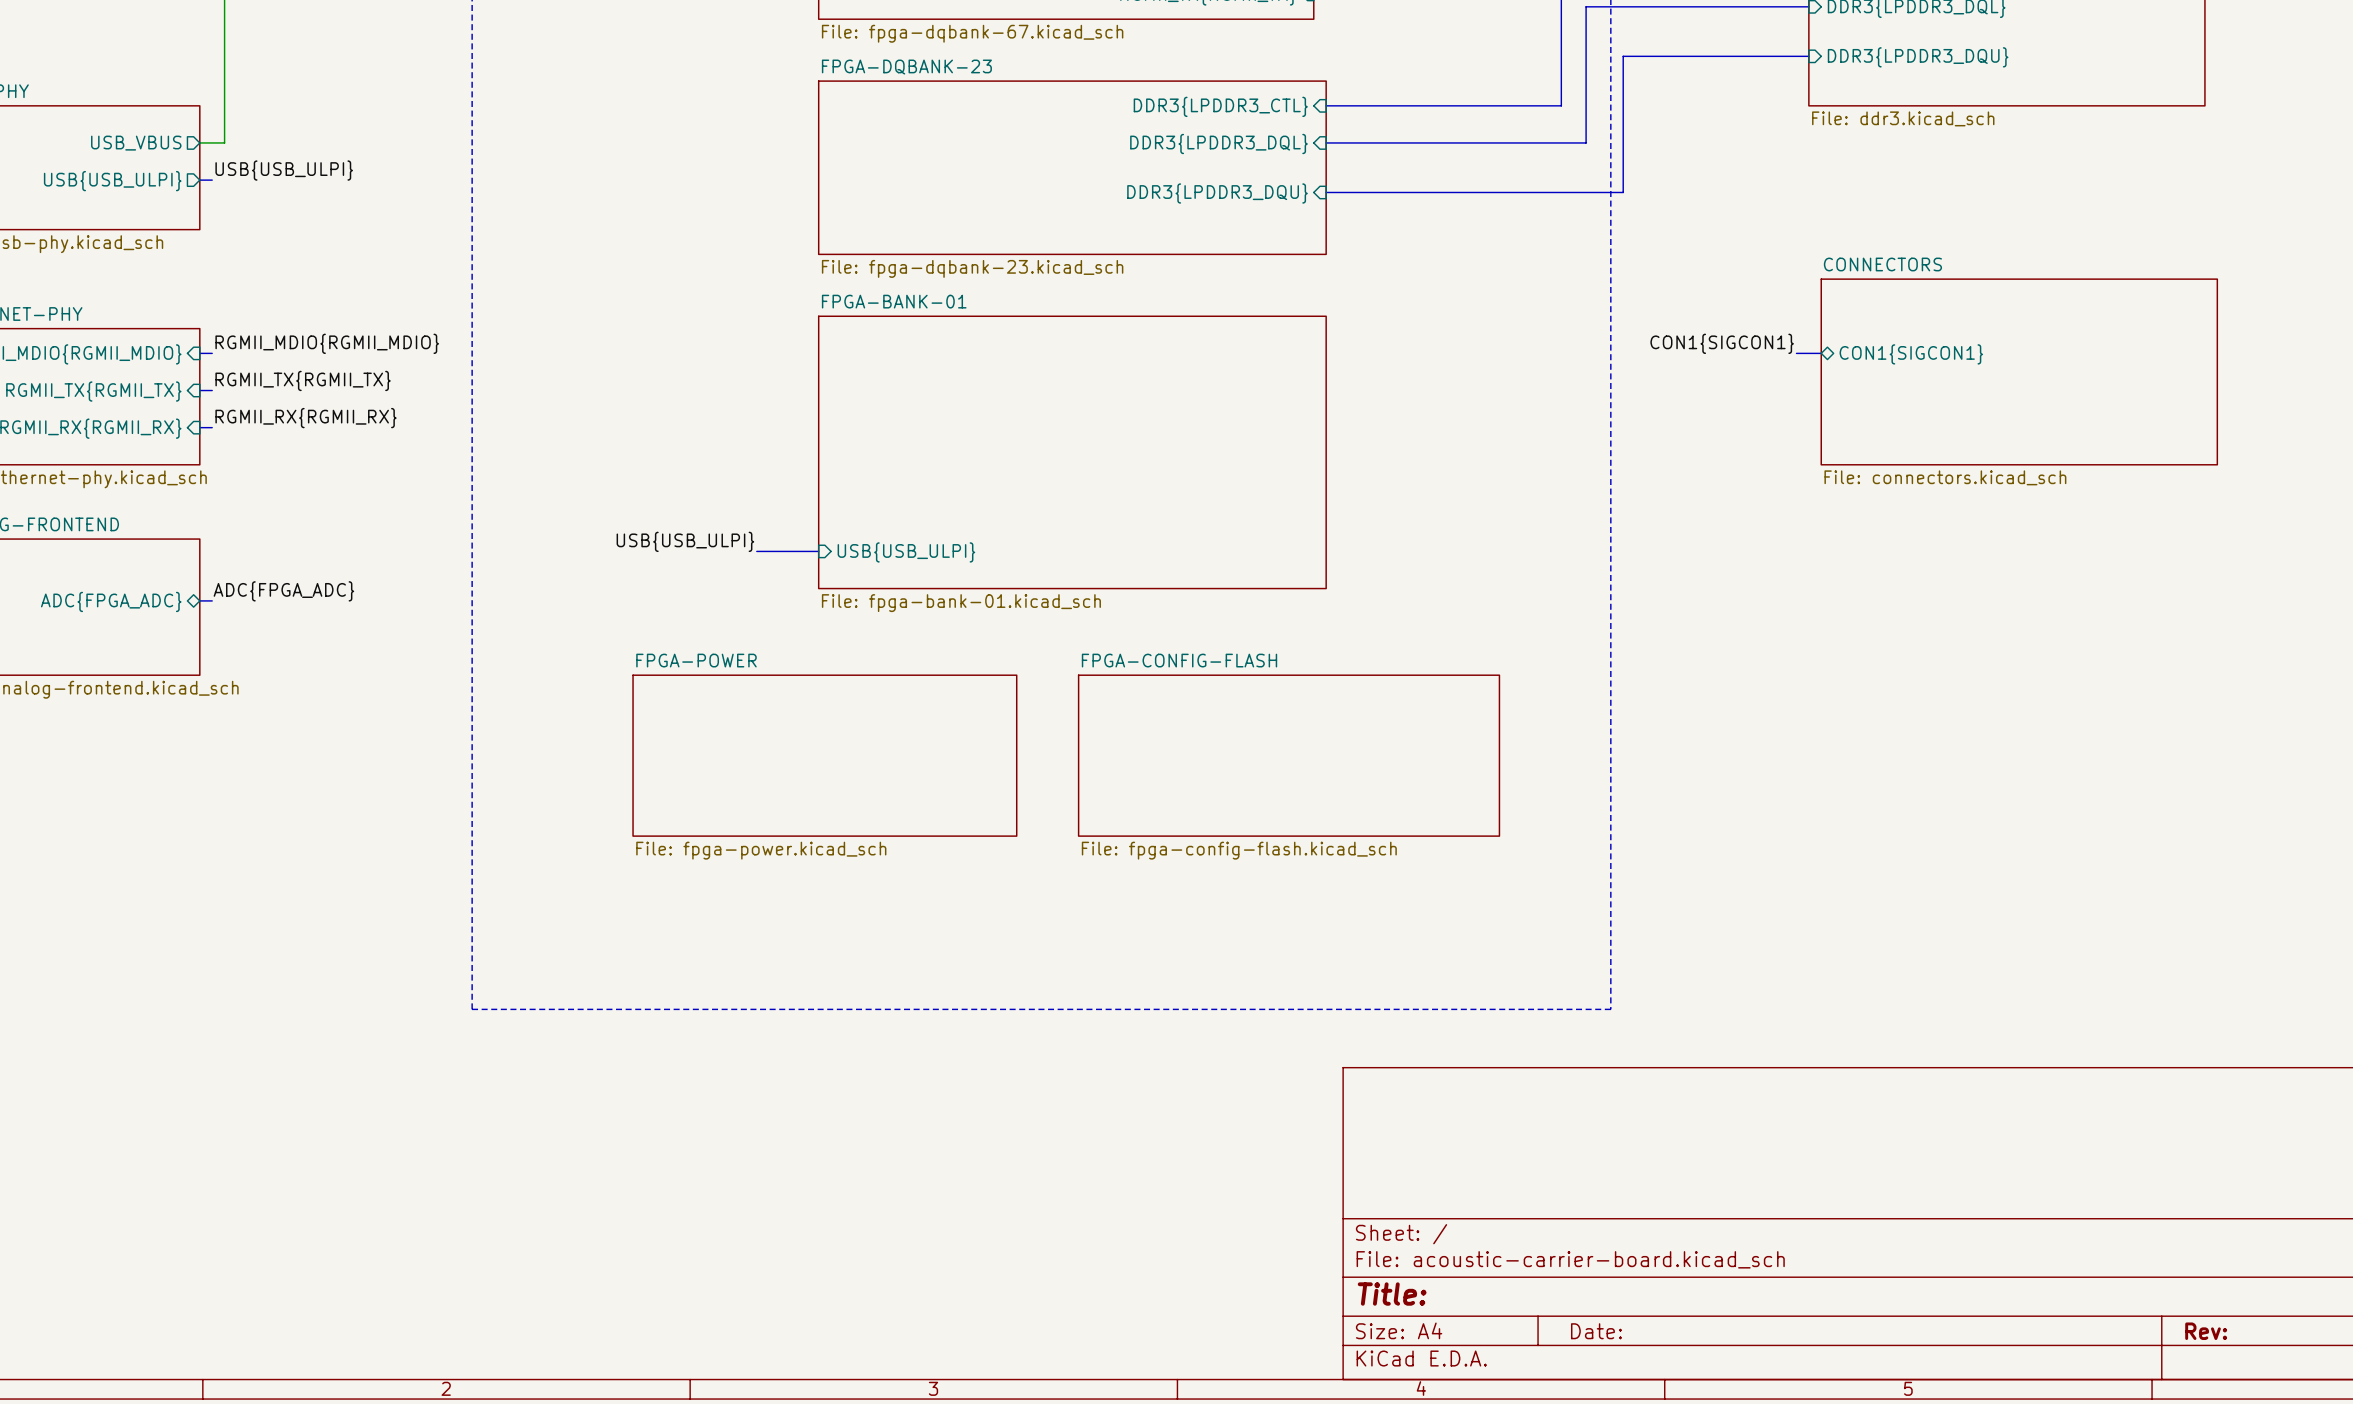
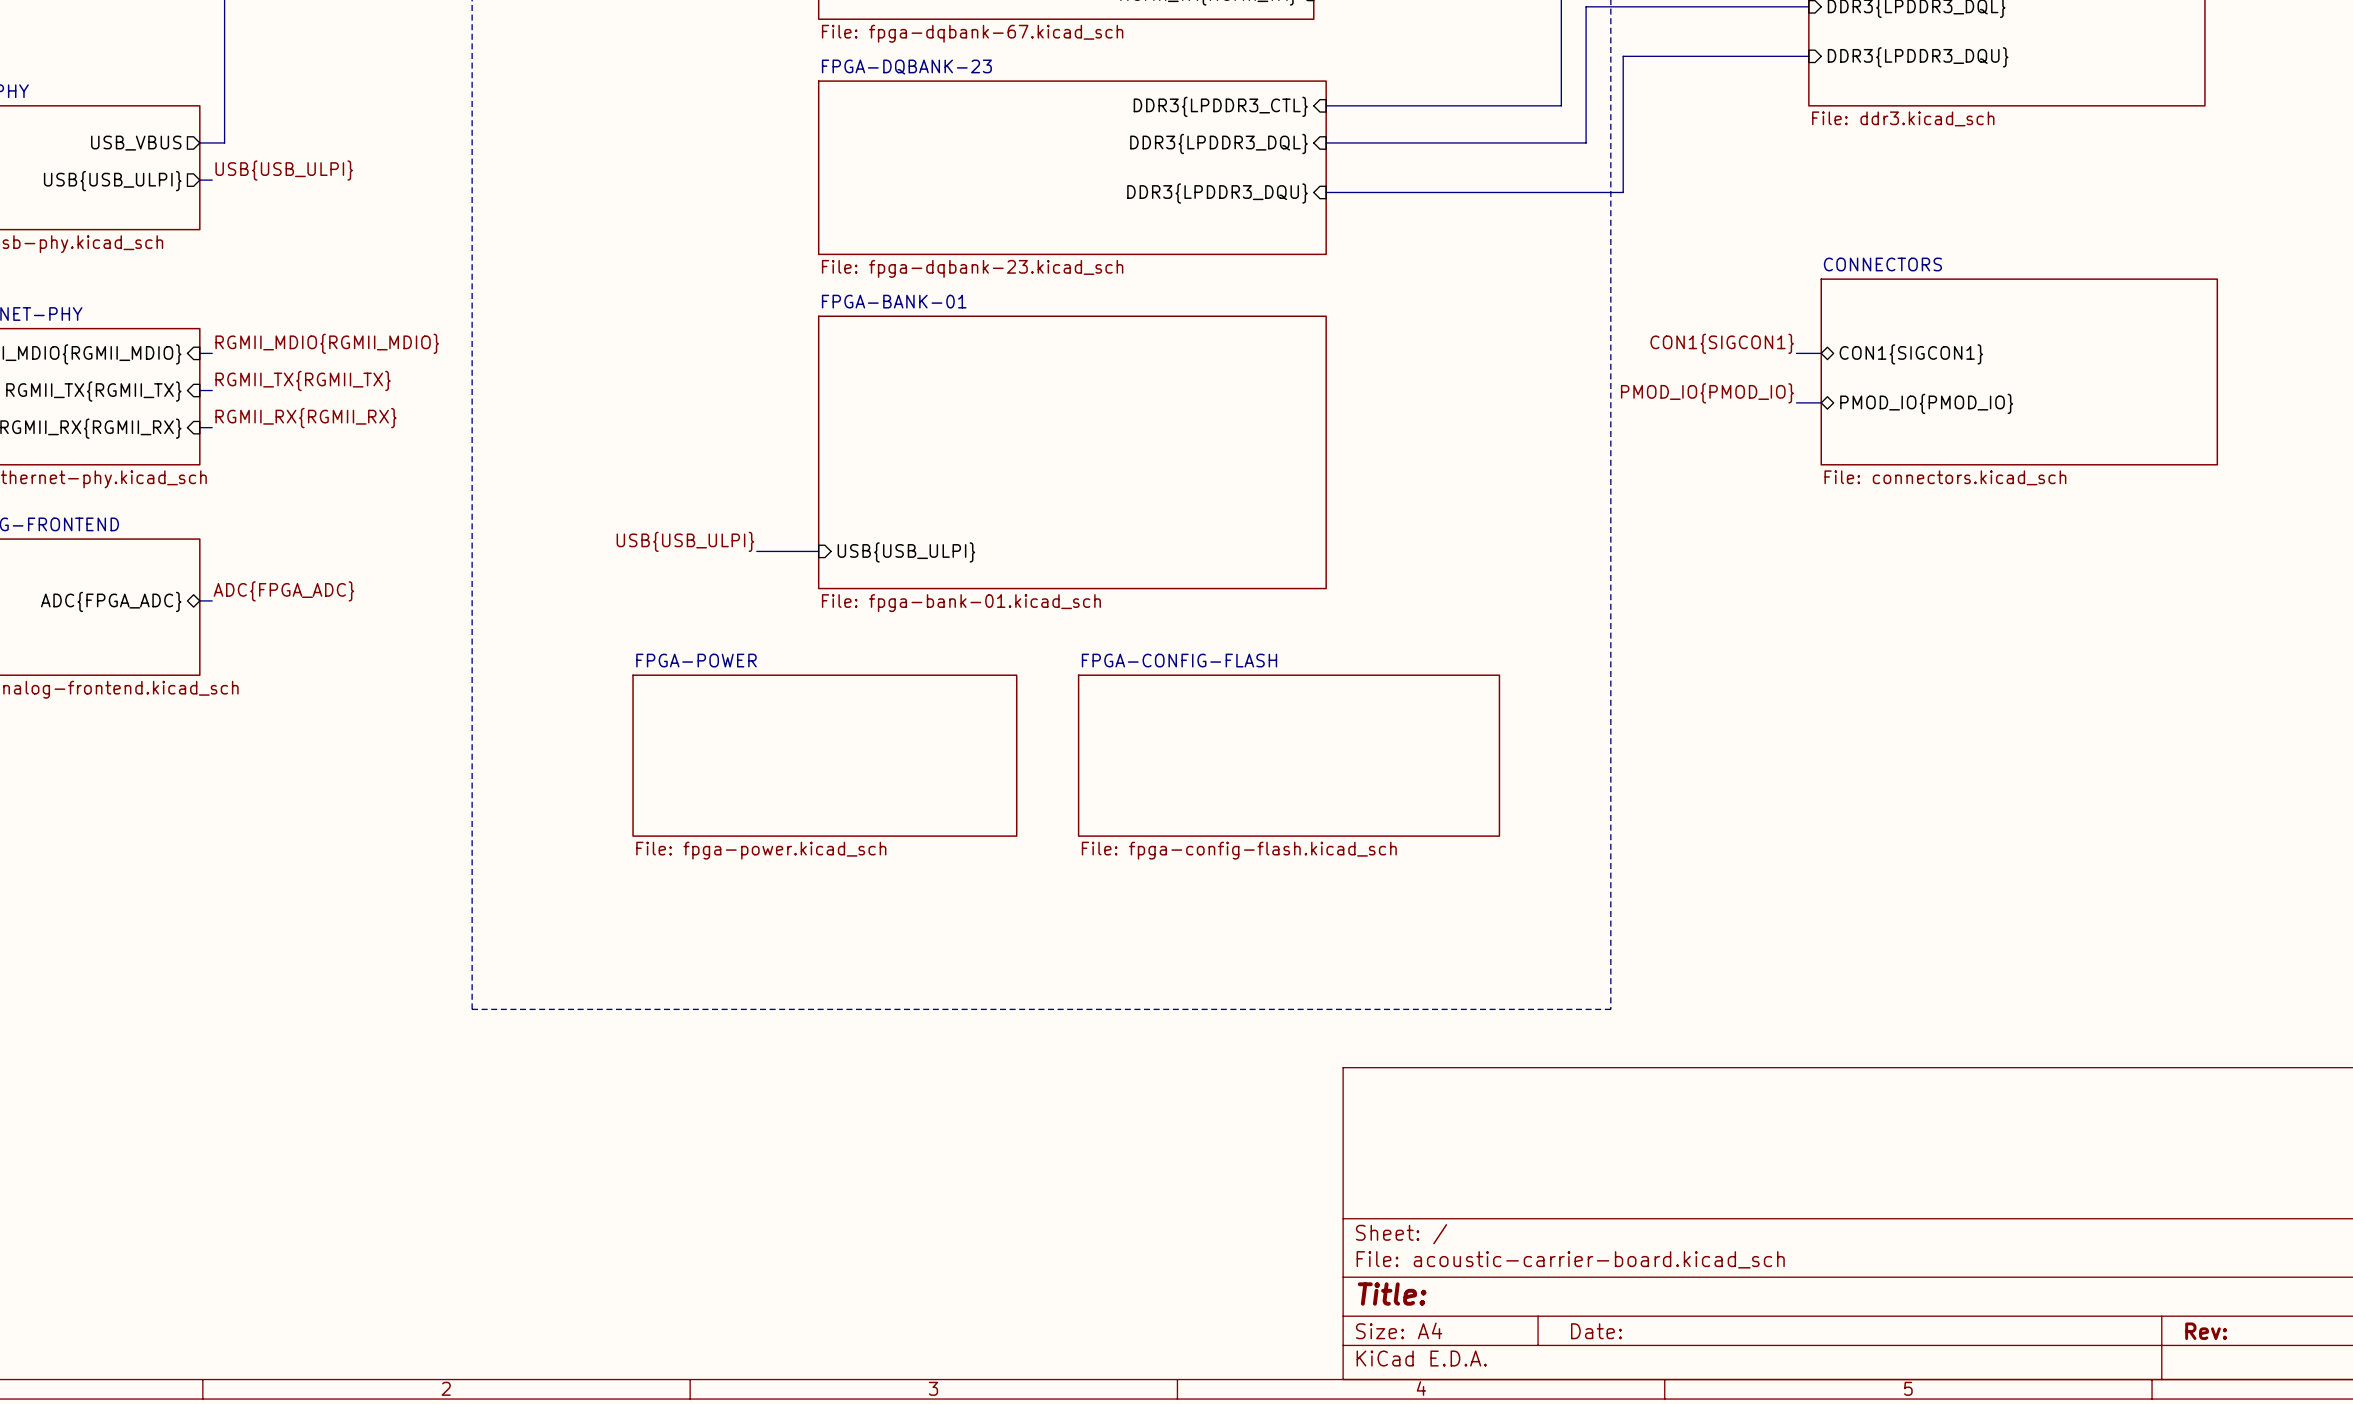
label: none -> PMOD_IO{PMOD_IO} (1707, 393)
bus: none -> (1796, 402) (1821, 402)
sheet pin: none -> PMOD_IO{PMOD_IO} (1926, 403)

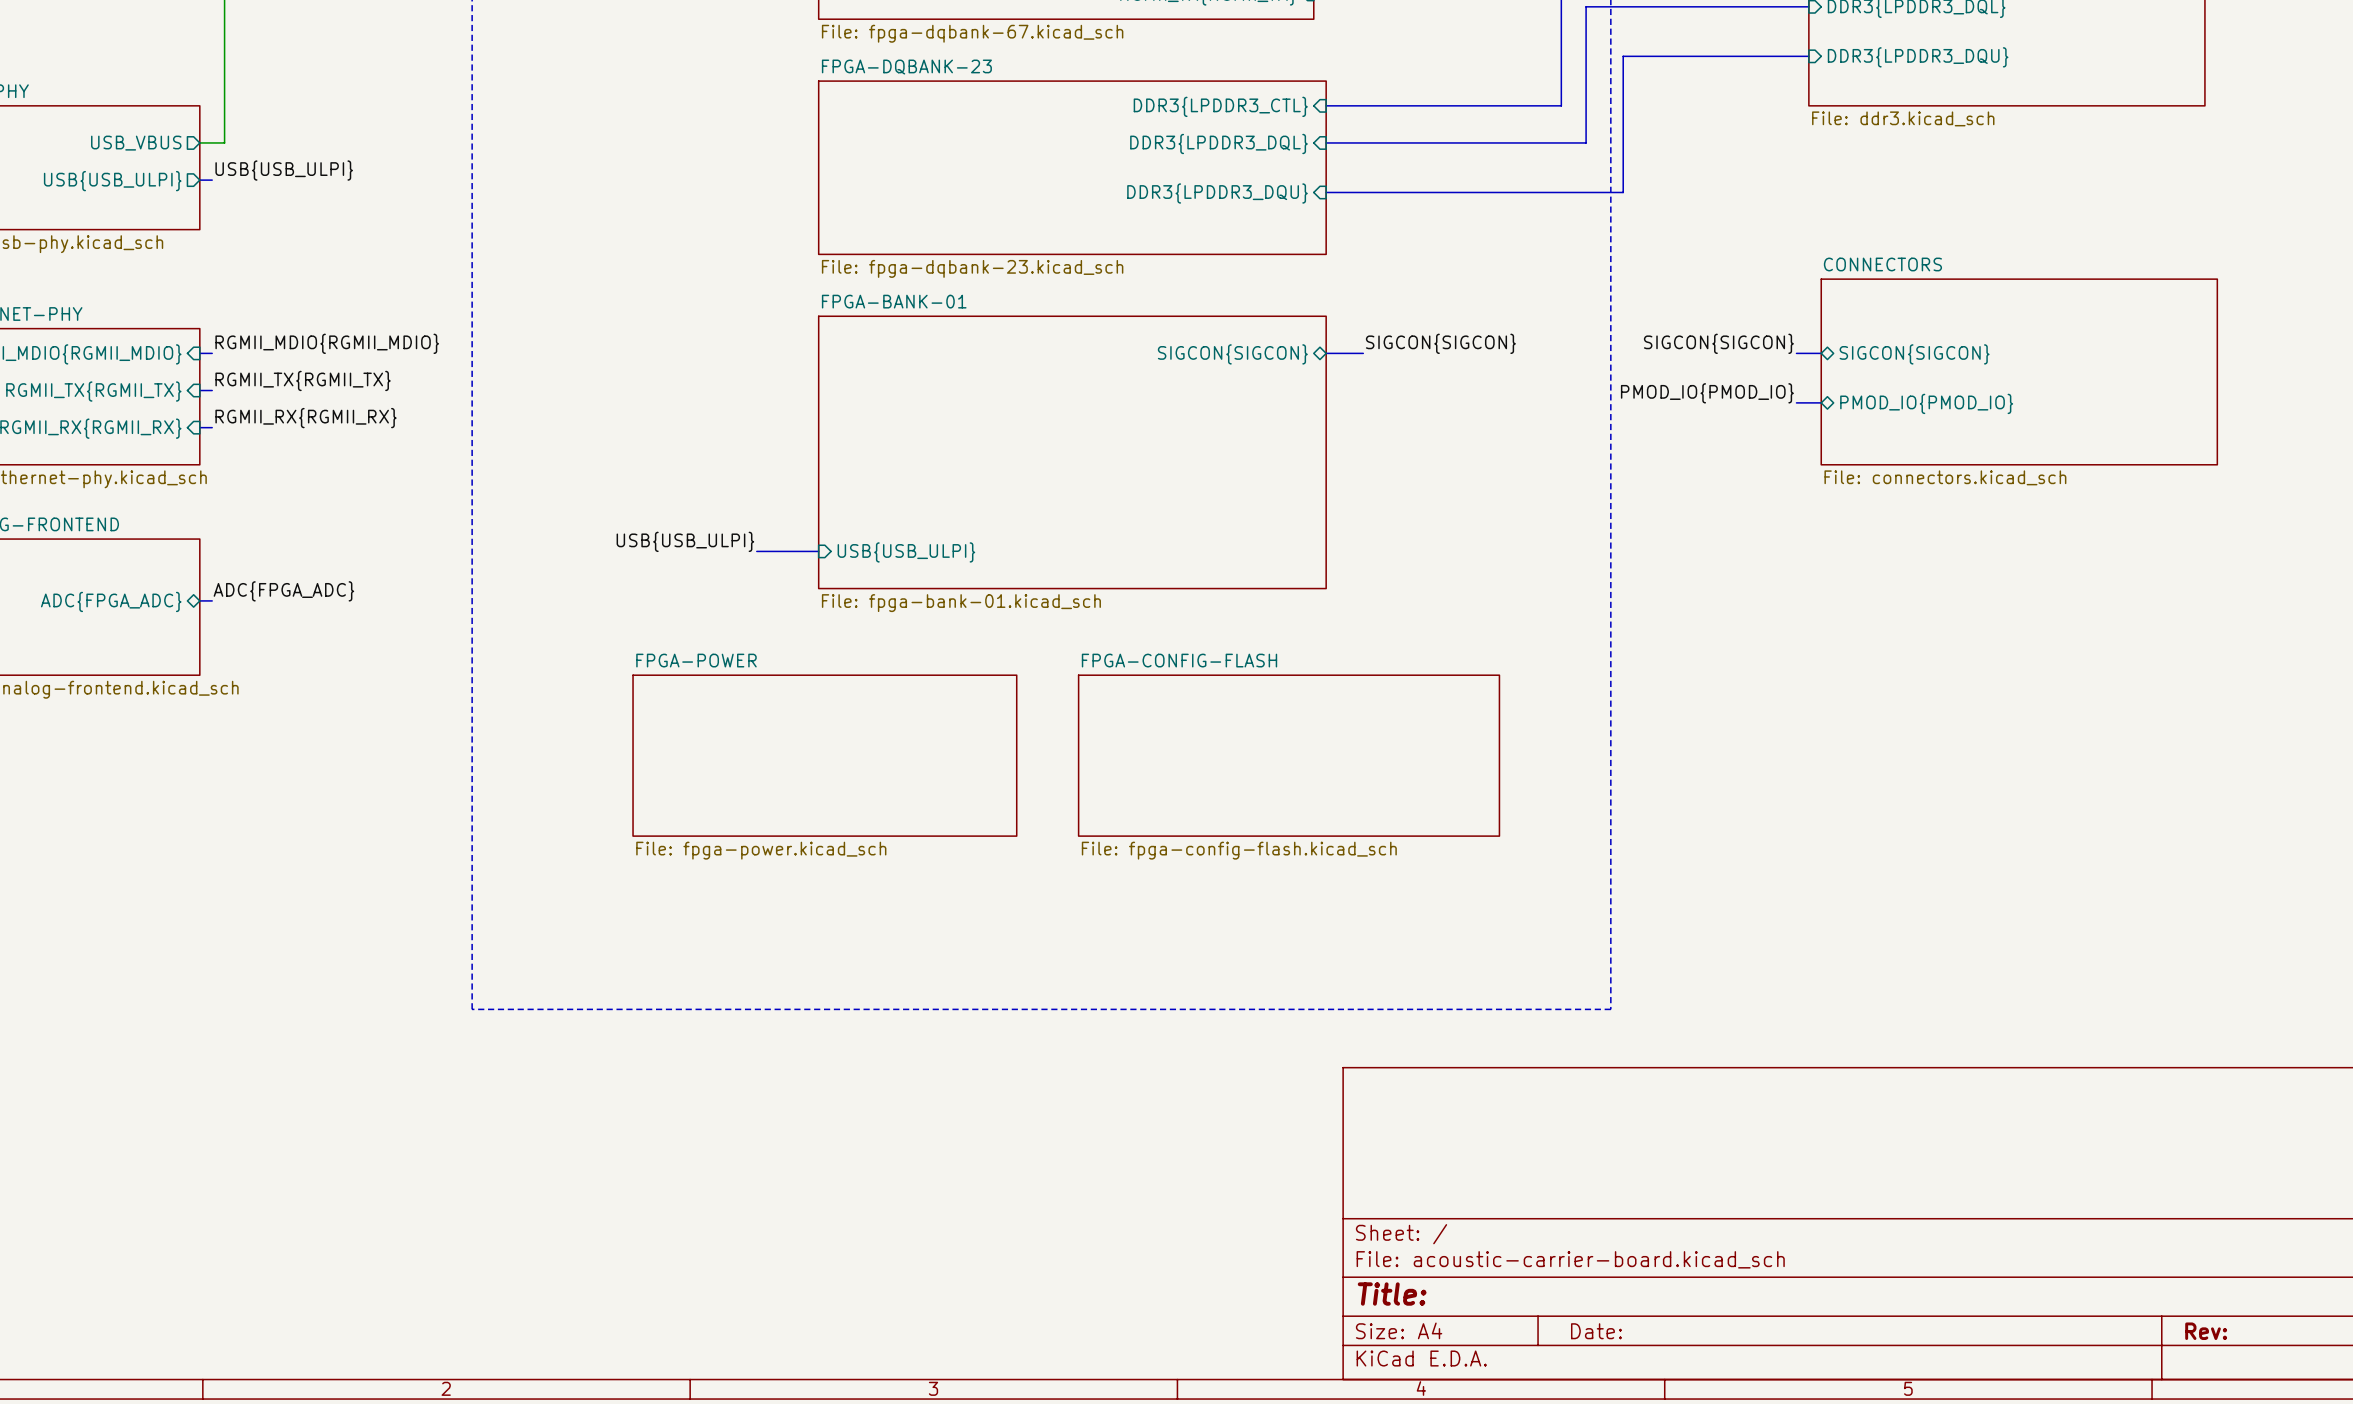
label: none -> SIGCON{SIGCON} (1440, 343)
label: CON1{SIGCON1} (1722, 343) -> SIGCON{SIGCON} (1718, 343)
bus: none -> (1326, 353) (1363, 353)
sheet pin: none -> SIGCON{SIGCON} (1232, 354)
sheet pin: CON1{SIGCON1} (1911, 354) -> SIGCON{SIGCON} (1914, 354)

